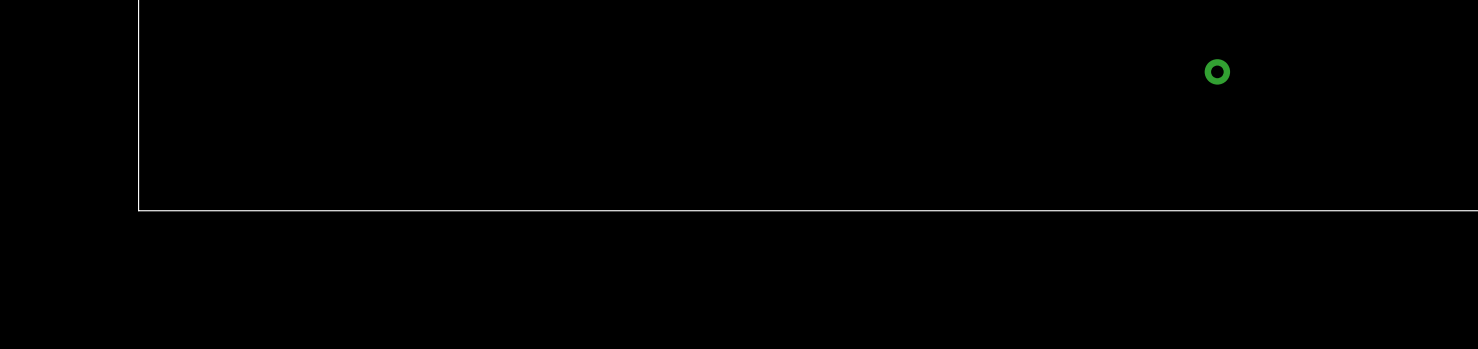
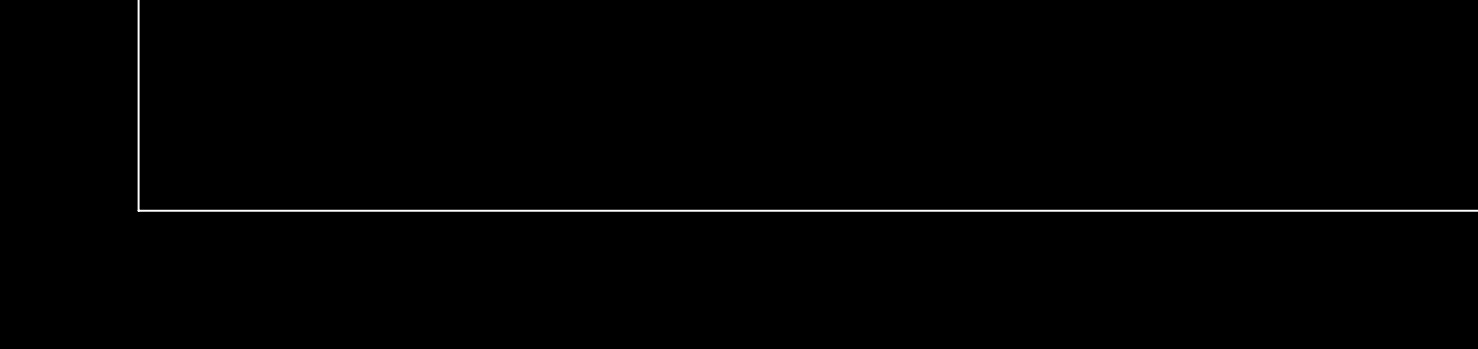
via: (1217, 71) -> none

